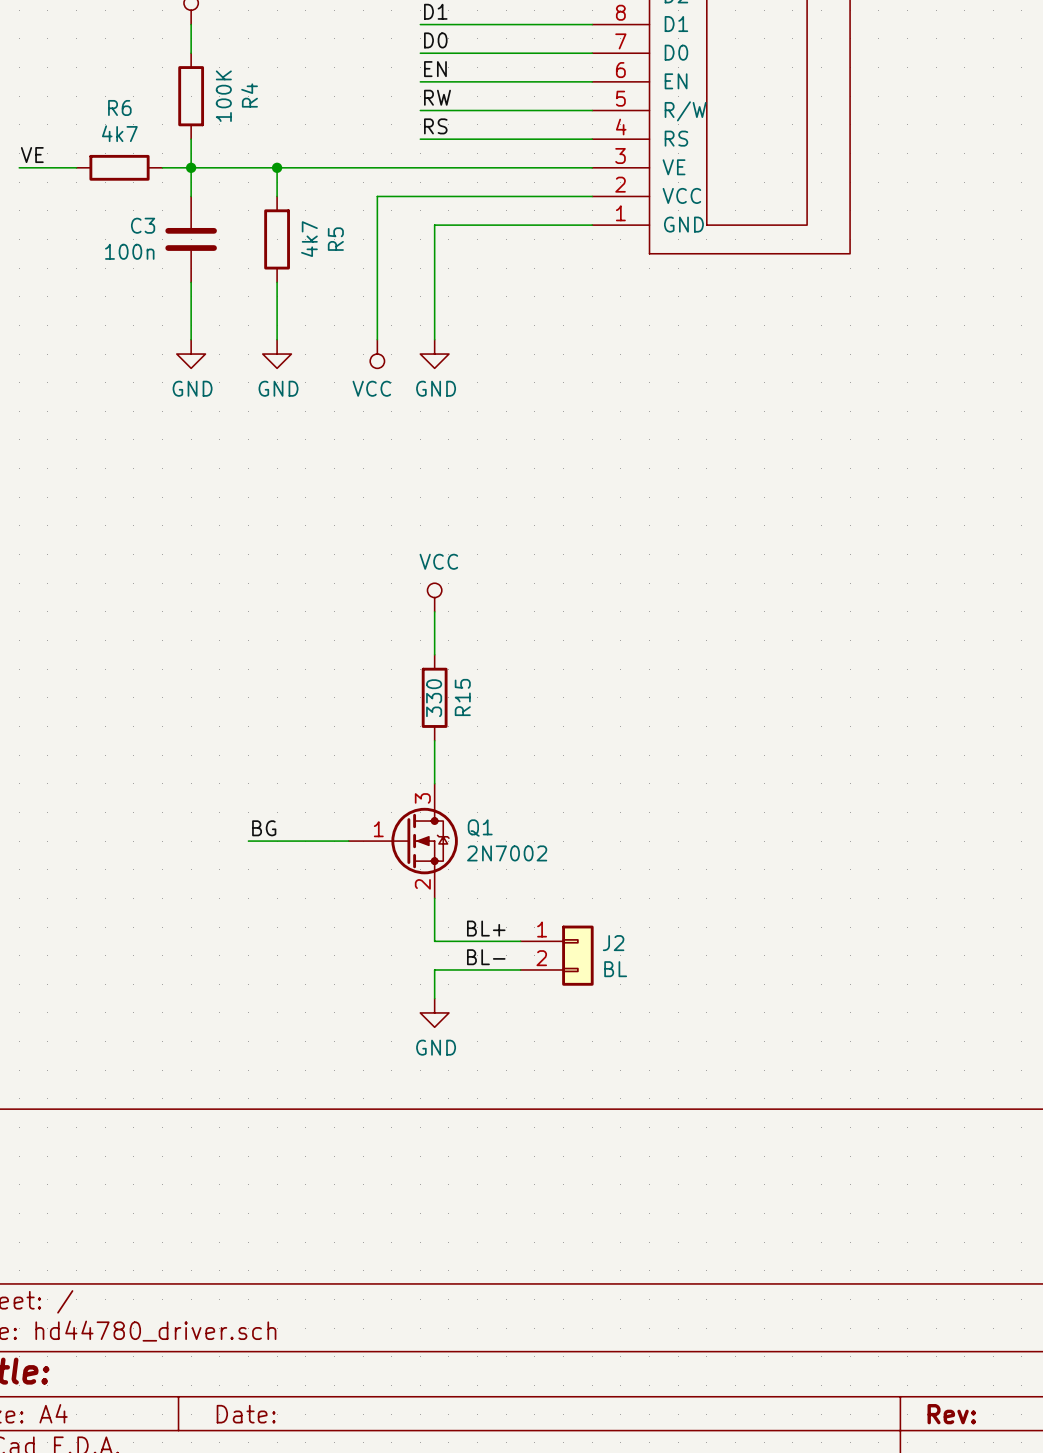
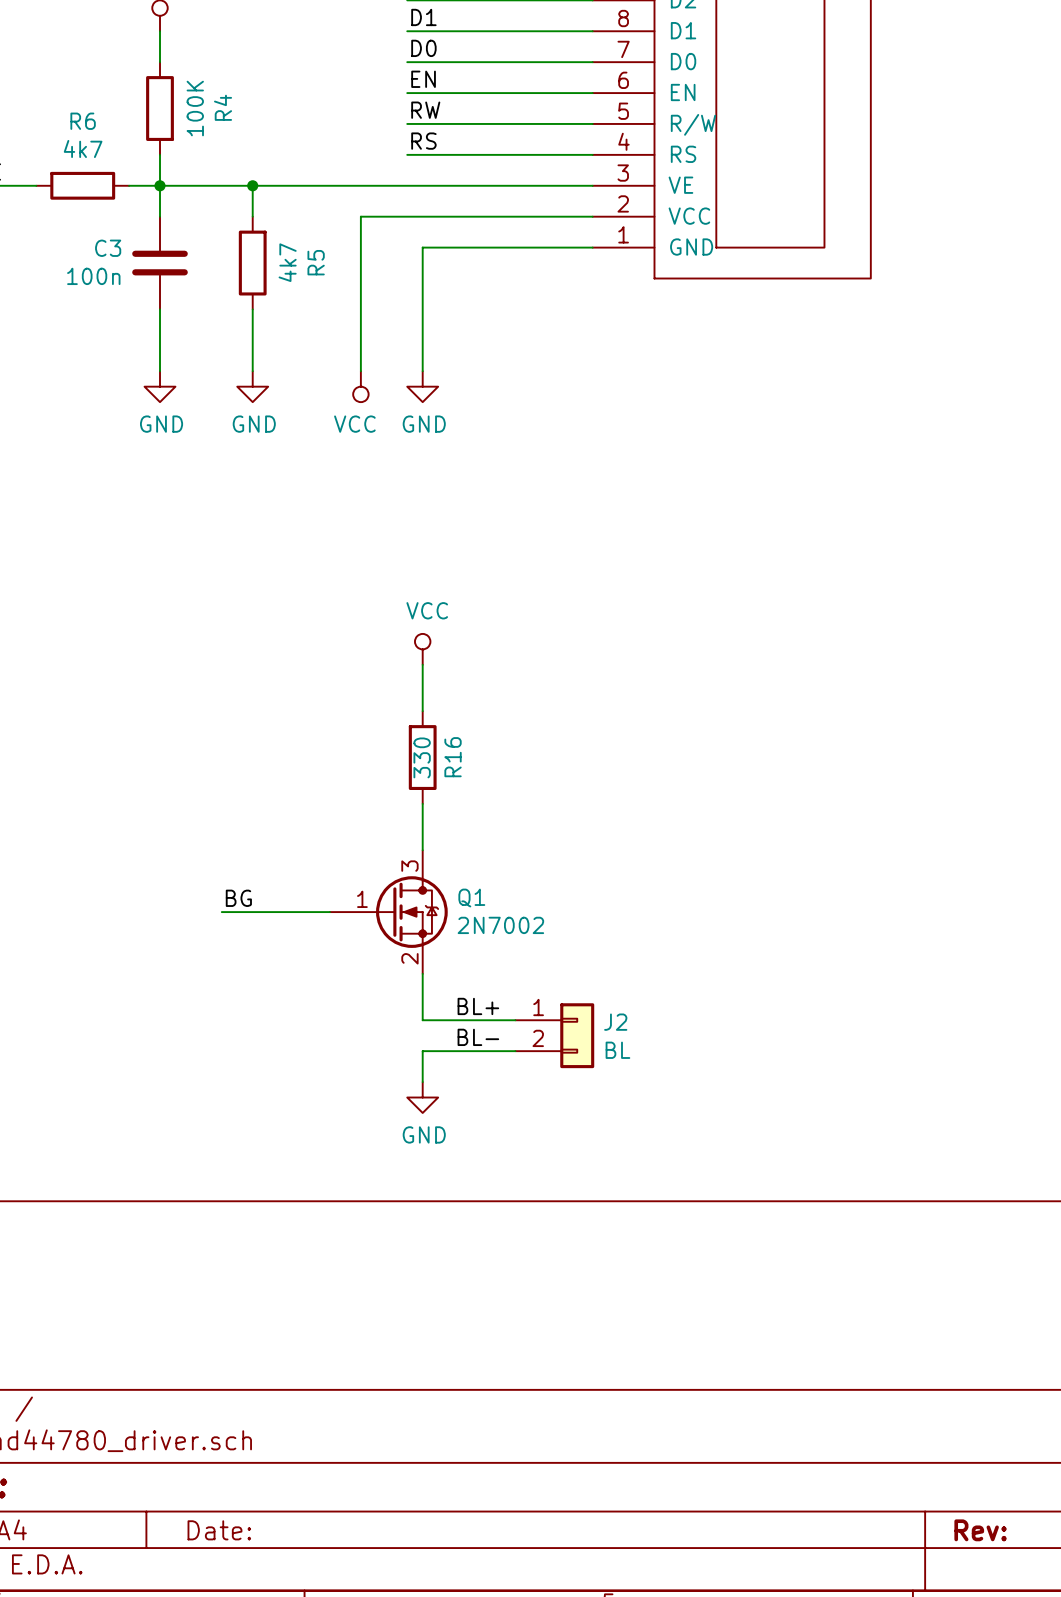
R15 name: R15 (462, 697) -> R16 (453, 757)

